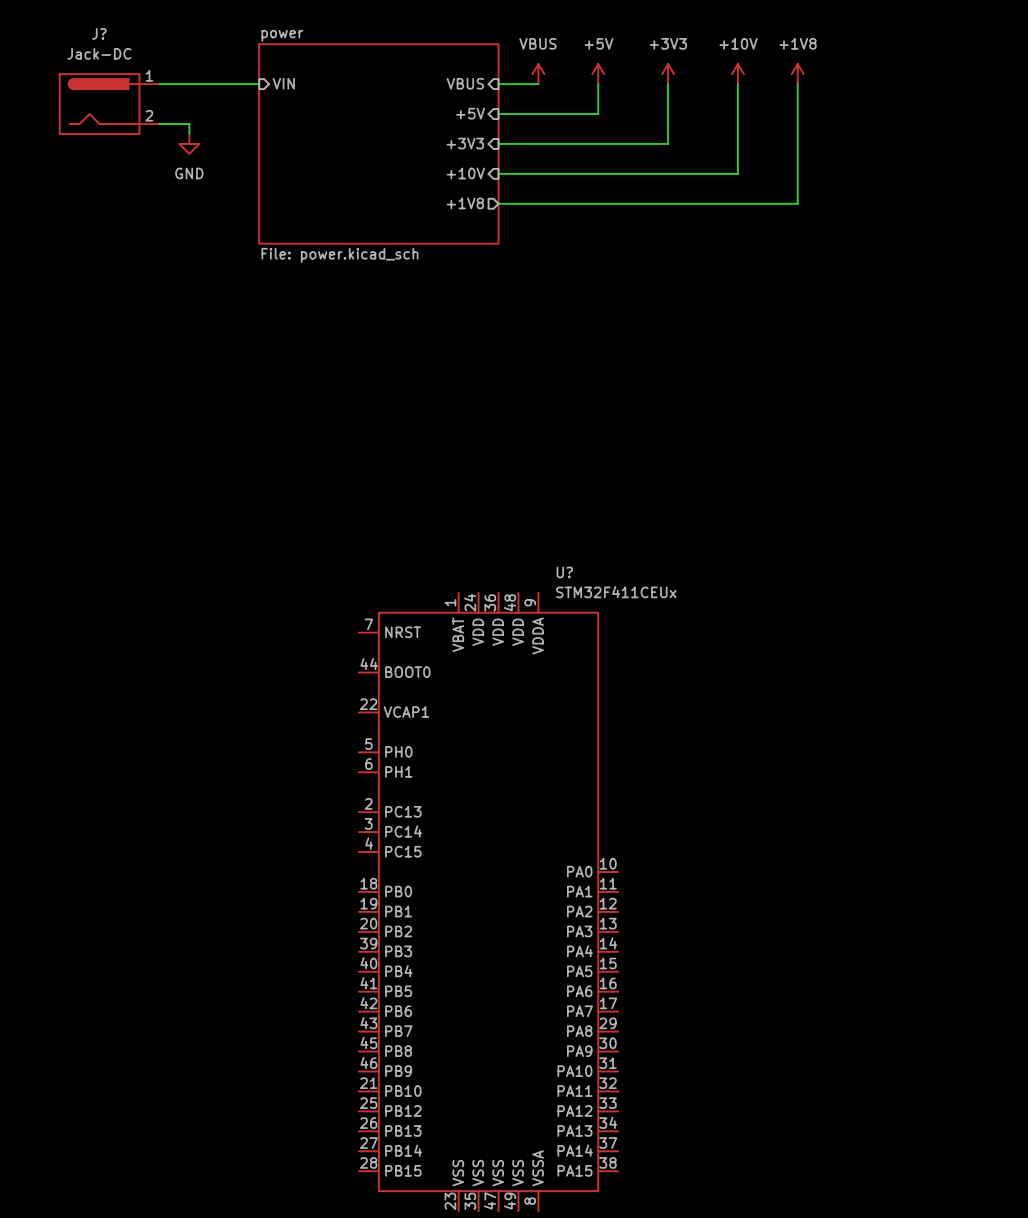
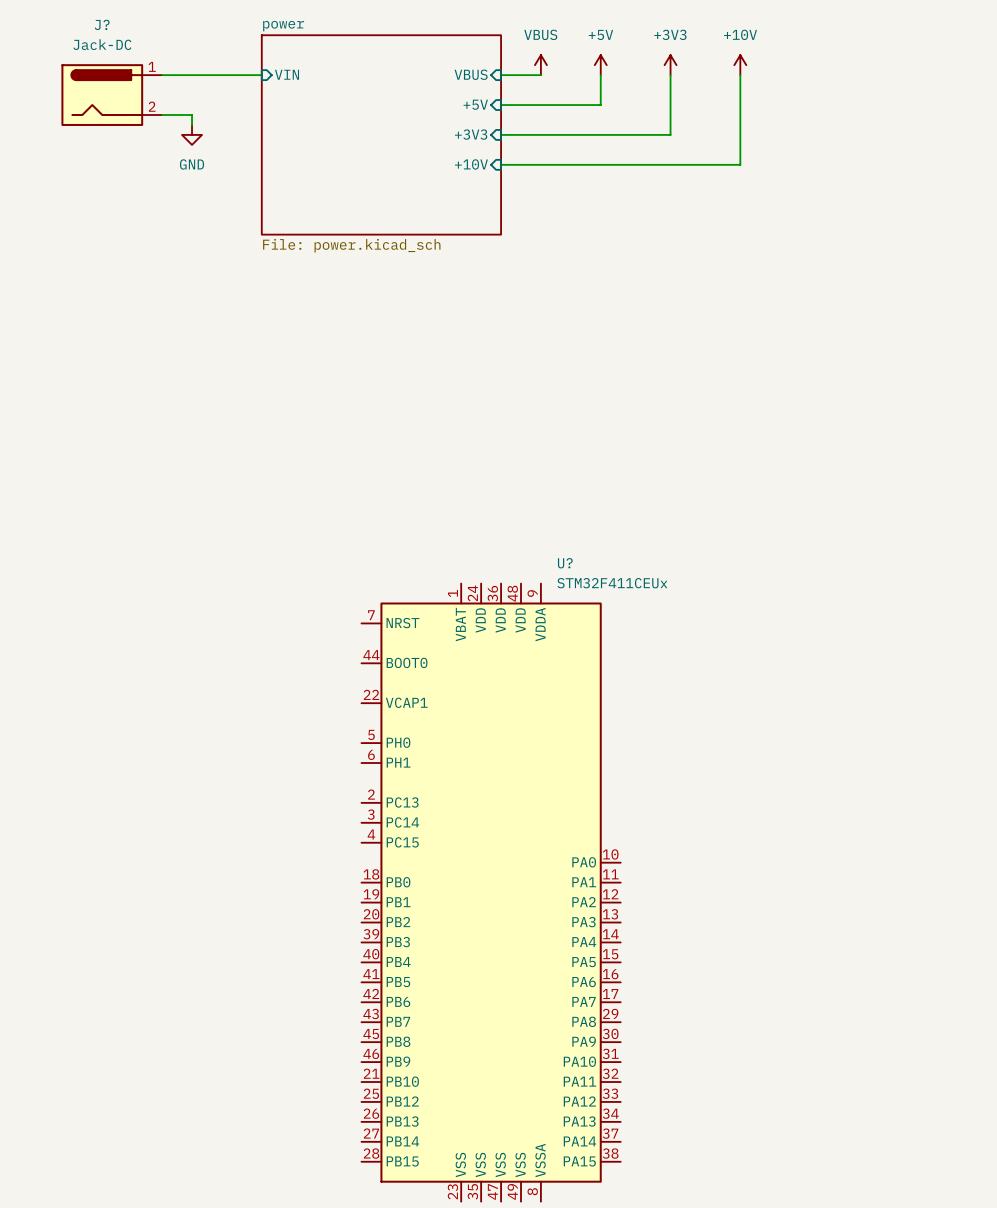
power symbol: +1V8 (797, 74) -> none
wire: (797, 84) (797, 203) (498, 203) -> none
sheet pin: +1V8 (465, 203) -> none

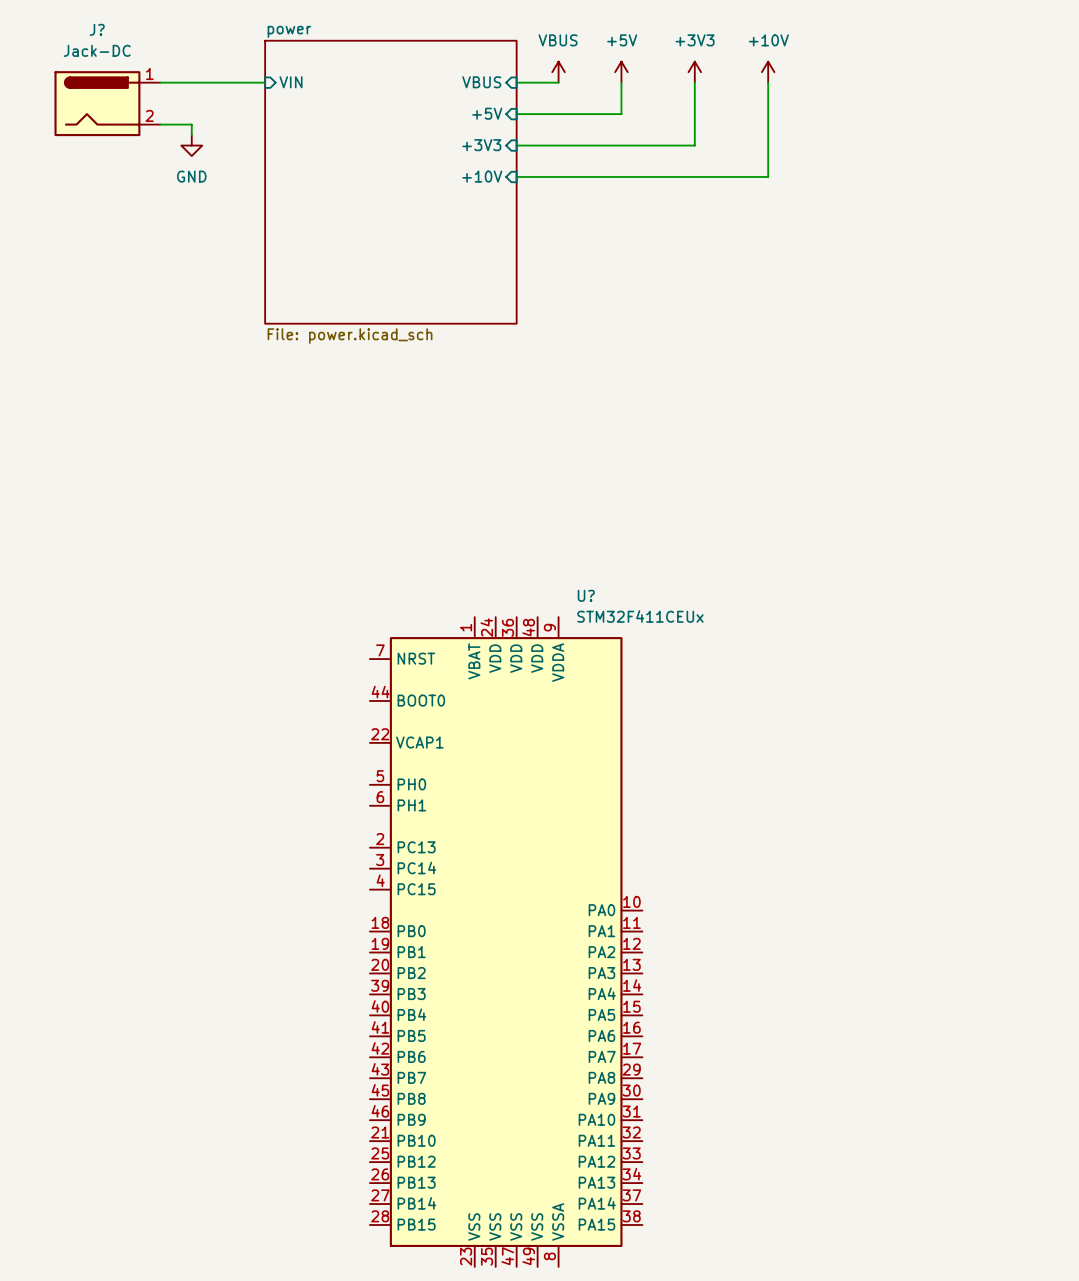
sheet power: File: power.kicad_sch (381, 134) -> none
sheet power: none -> File: power.kicad_sch (390, 182)

